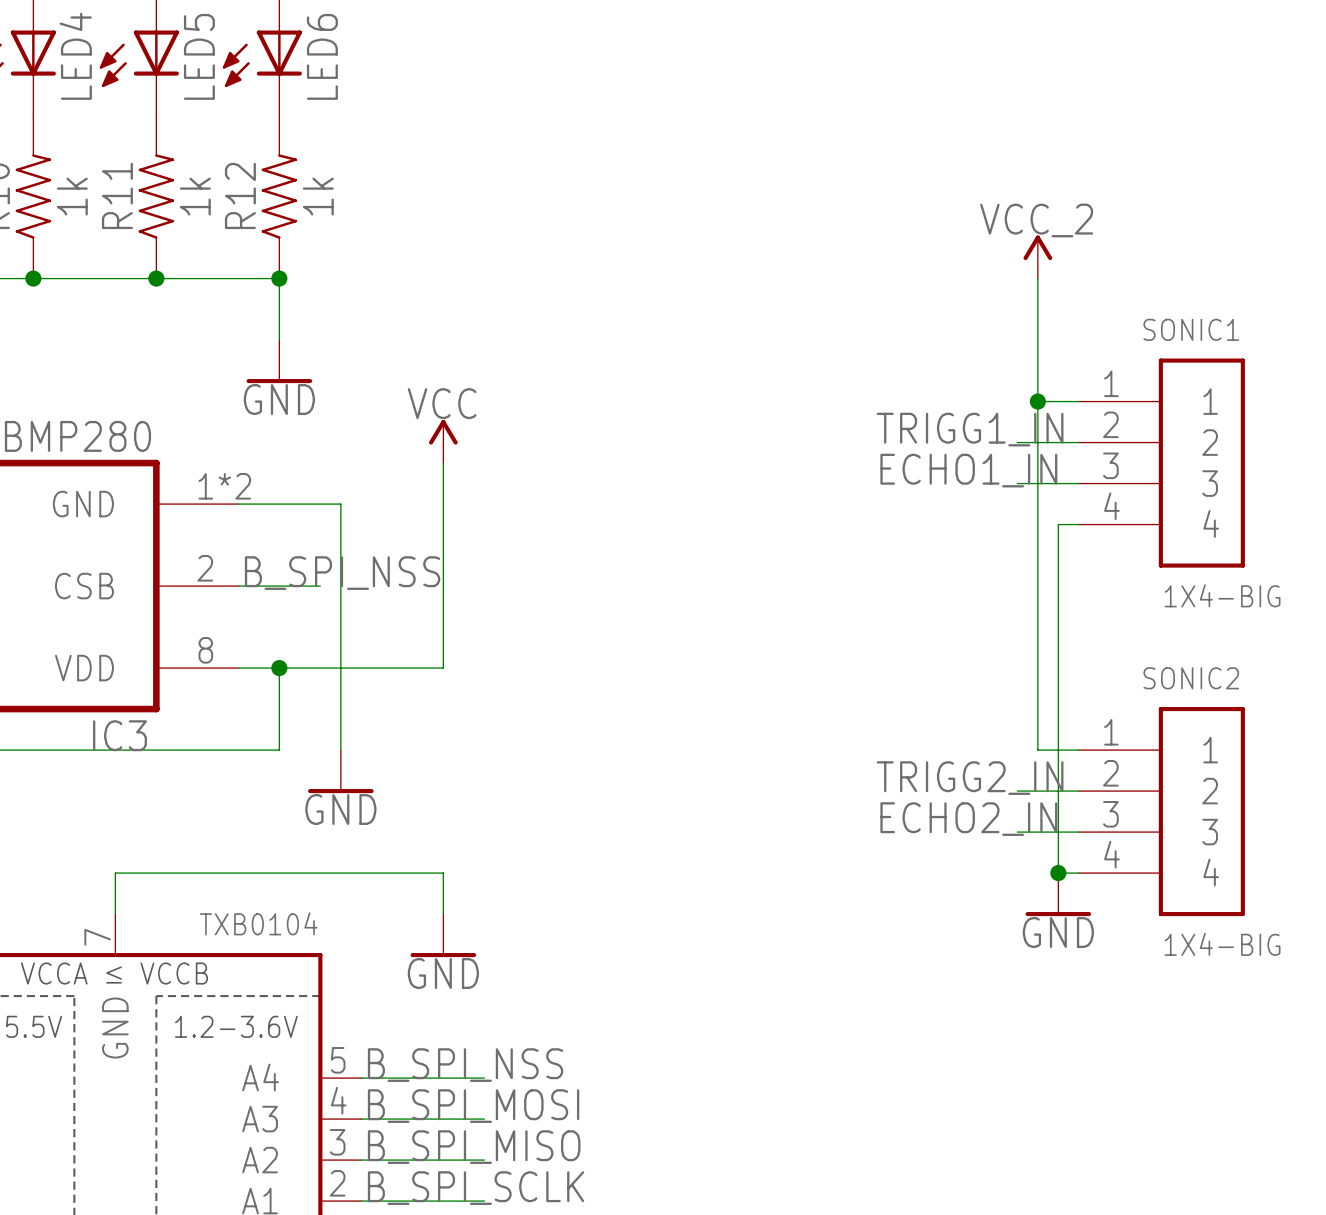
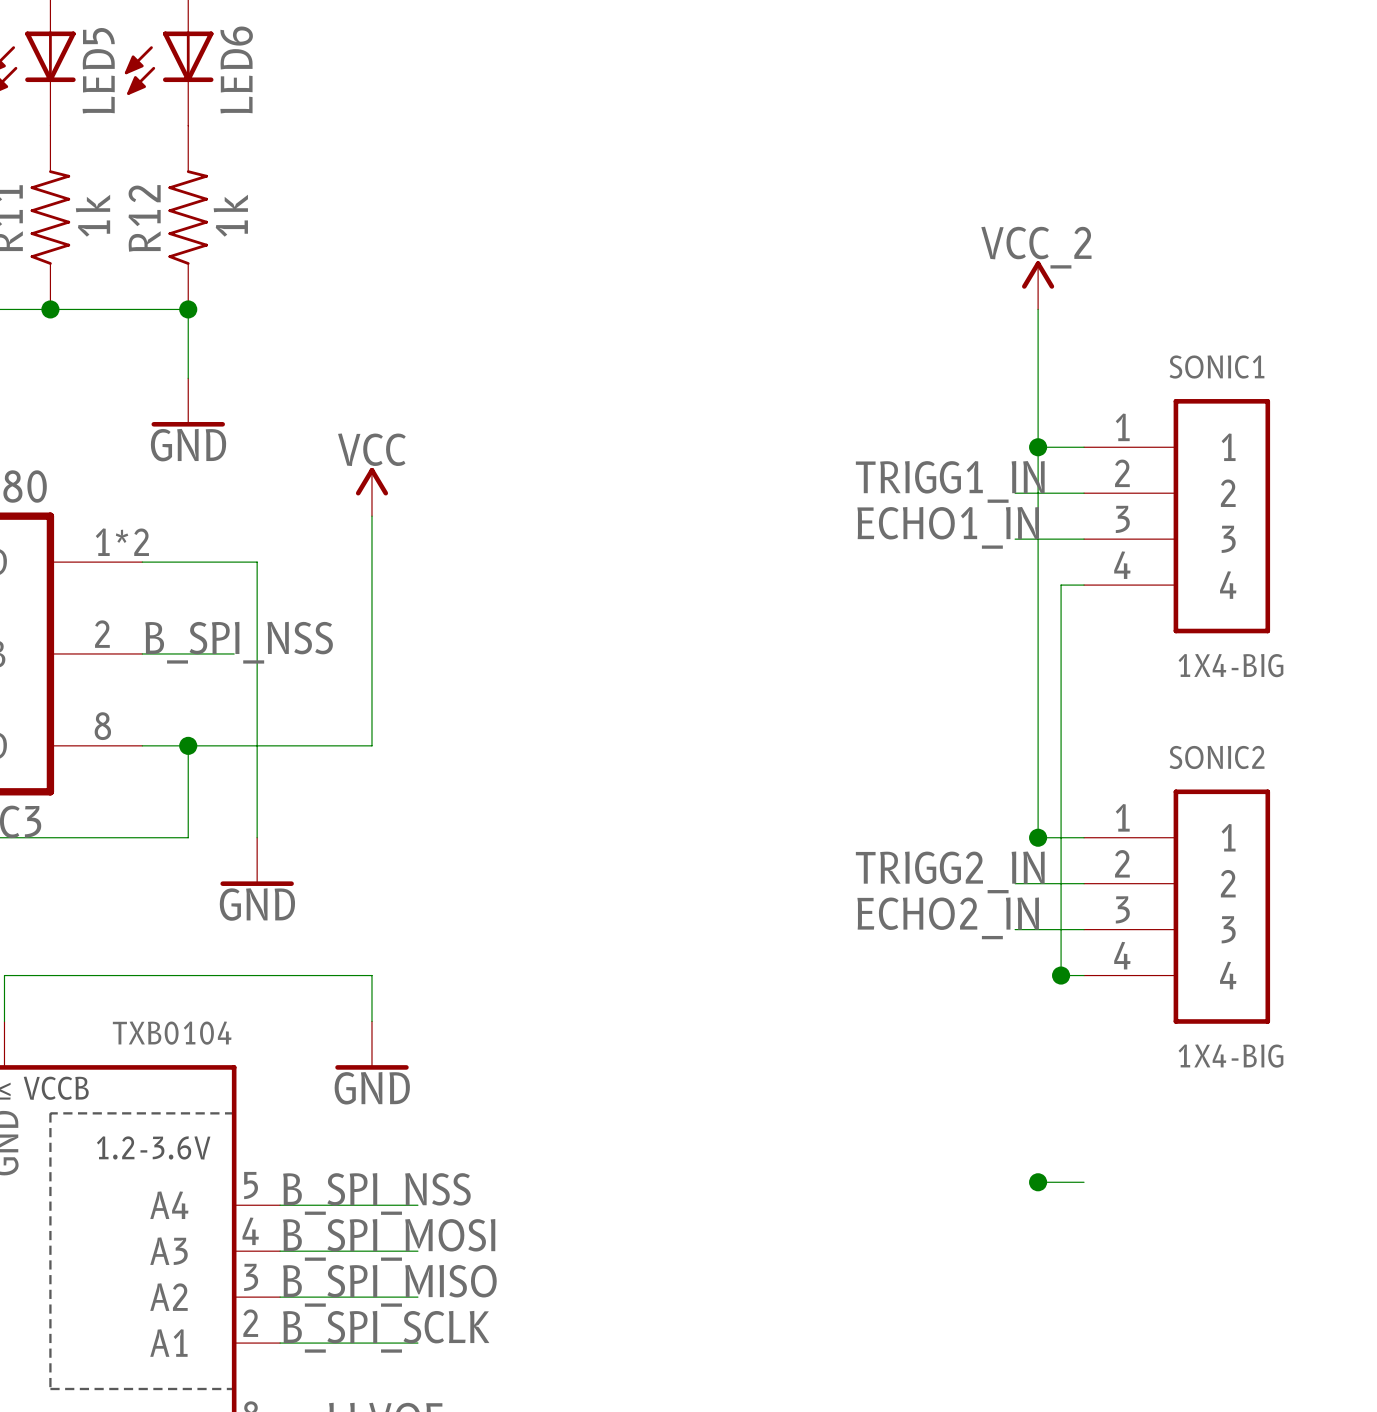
junction: none -> (1038, 837)
power symbol: GND (1058, 894) -> none
wire: none -> (1038, 1182) (1084, 1182)
junction: none -> (1038, 1182)

